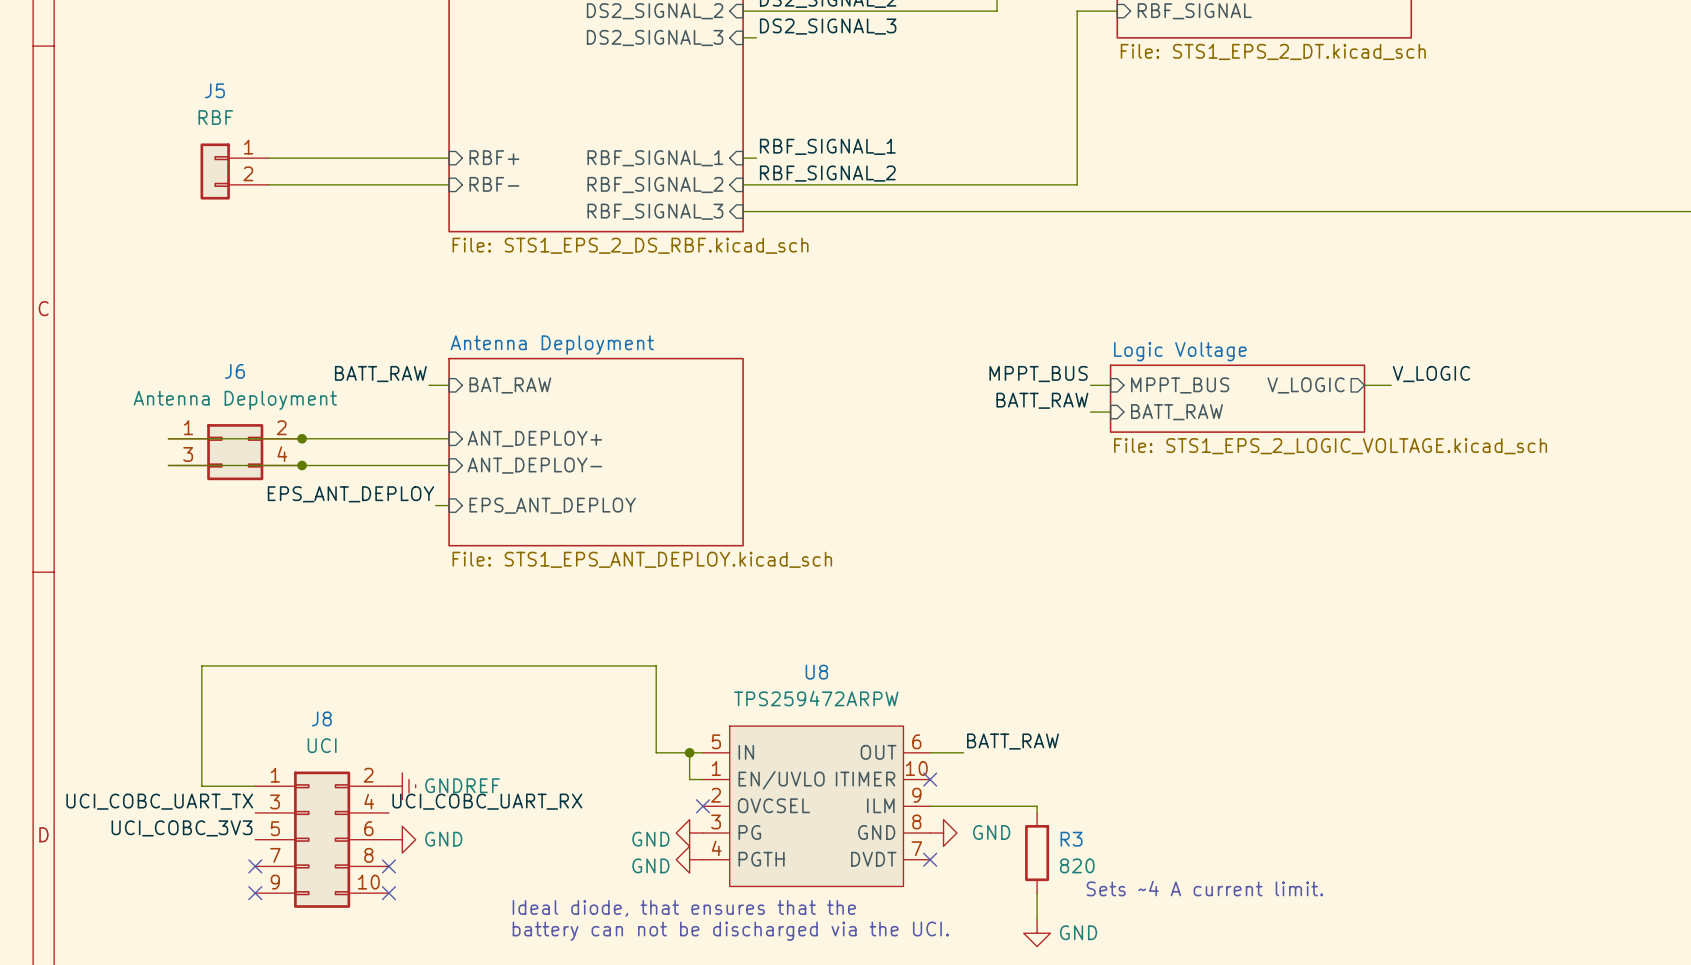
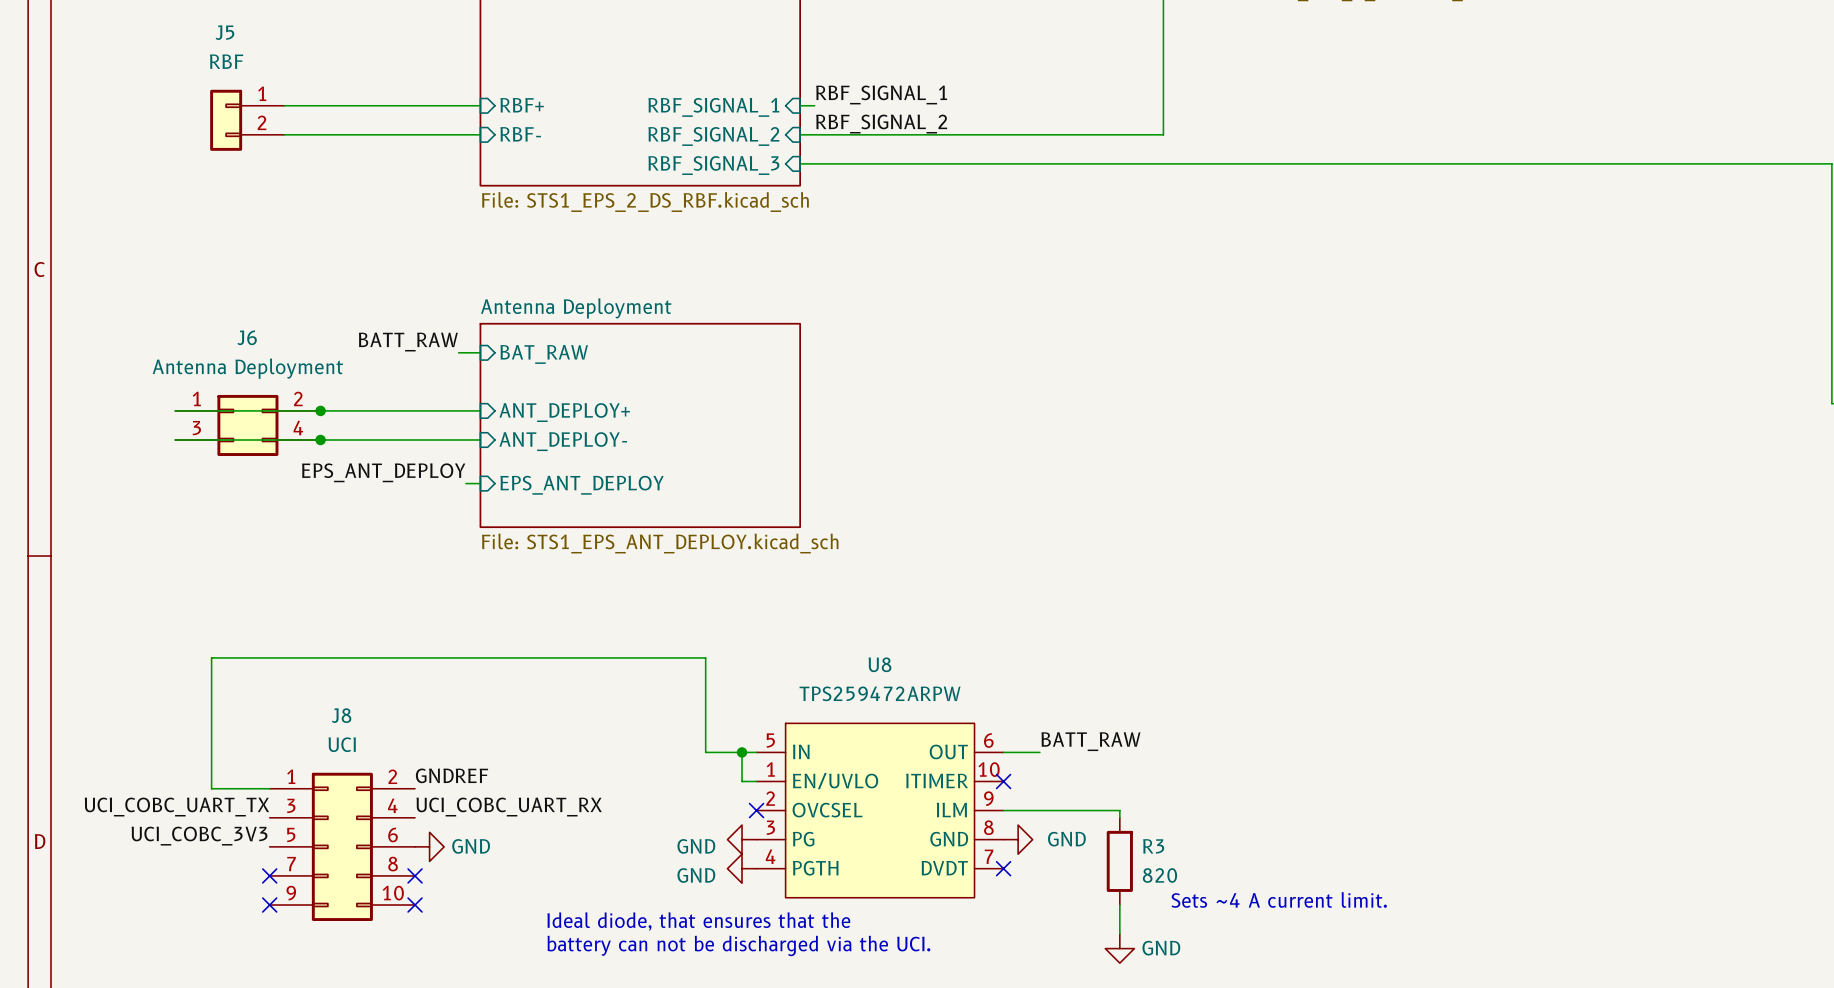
label: MPPT_BUS (1038, 374) -> none
label: V_LOGIC (1431, 374) -> none
wire: (1090, 385) (1110, 385) -> none
sheet pin: MPPT_BUS (1180, 385) -> none
sheet pin: V_LOGIC (1306, 385) -> none
wire: (1364, 385) (1391, 385) -> none
sheet Logic Voltage: File: STS1_EPS_2_LOGIC_VOLTAGE.kicad_sch (1237, 398) -> none
label: BATT_RAW (1042, 400) -> none
wire: (1090, 412) (1110, 412) -> none
sheet pin: BATT_RAW (1176, 412) -> none
label: none -> GNDREF (452, 775)
power symbol: GNDREF (402, 786) -> none

